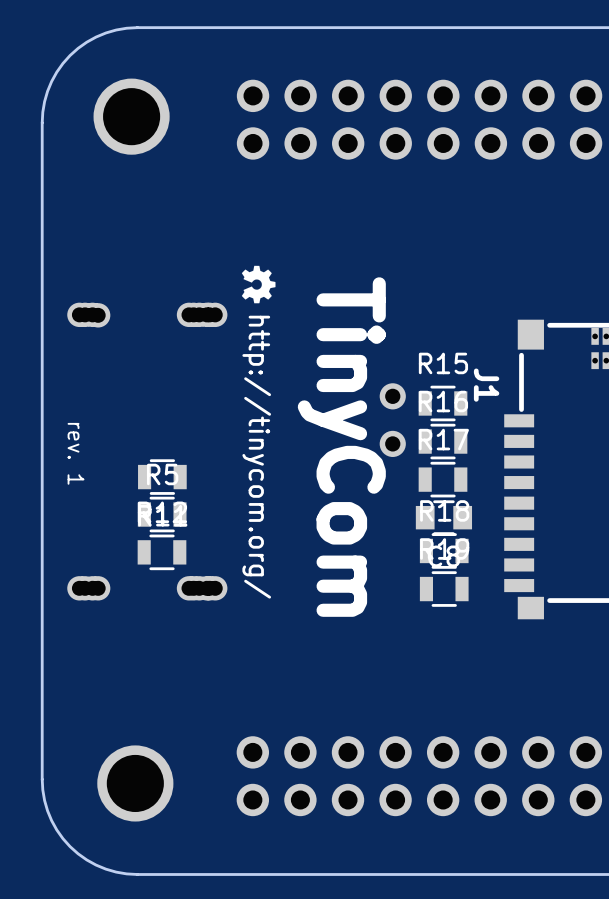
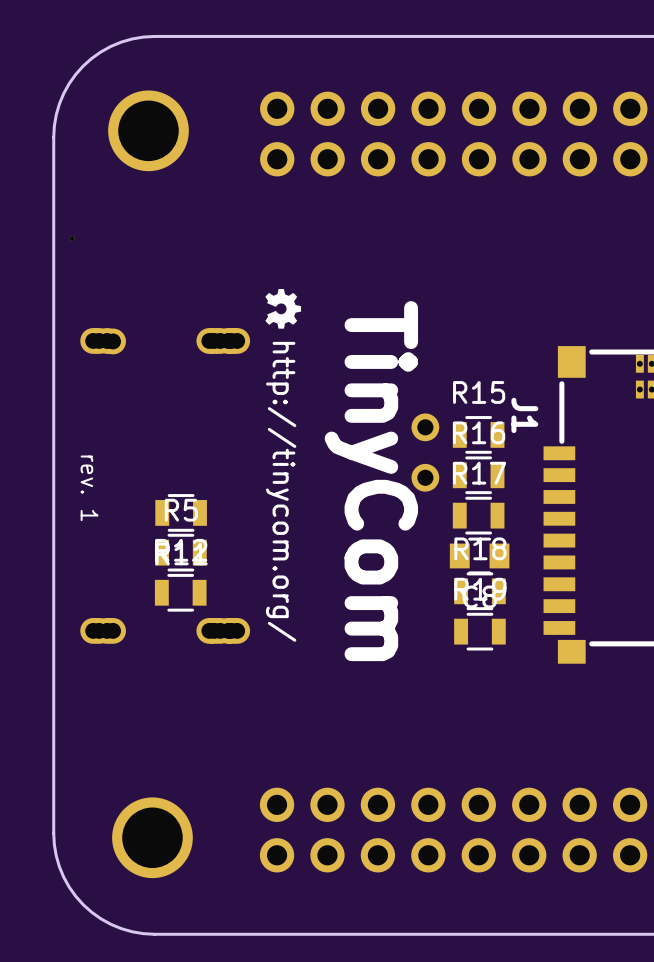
part: none -> (72, 238)

